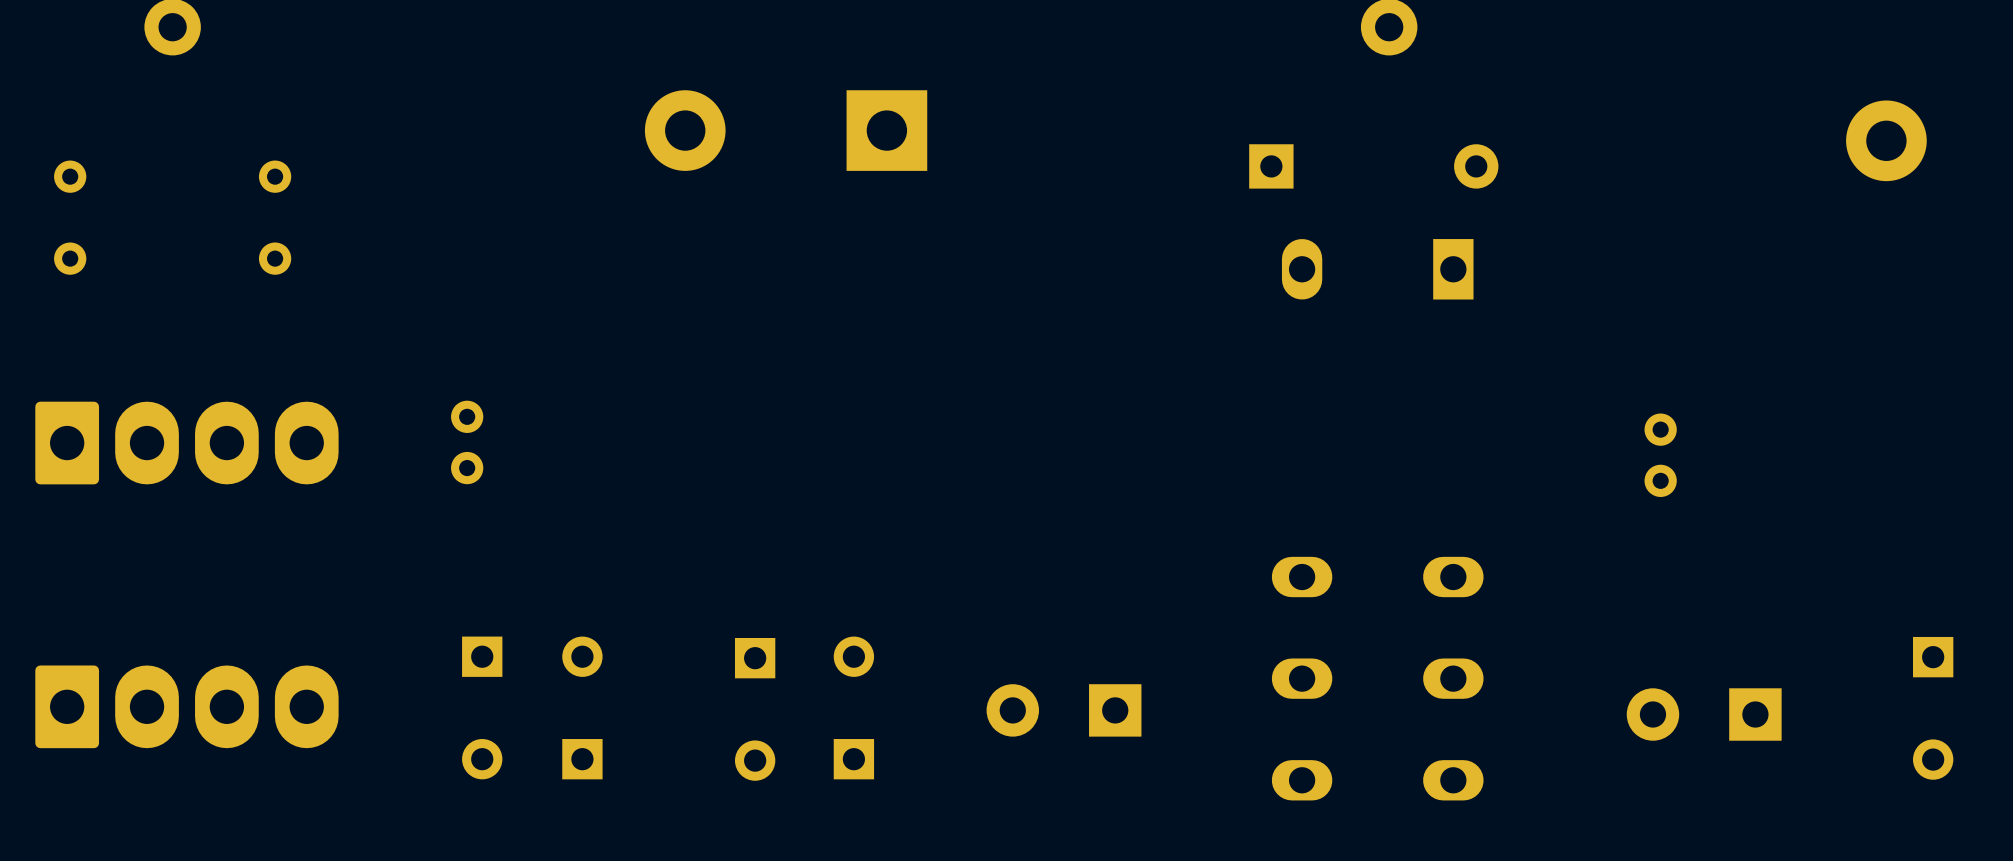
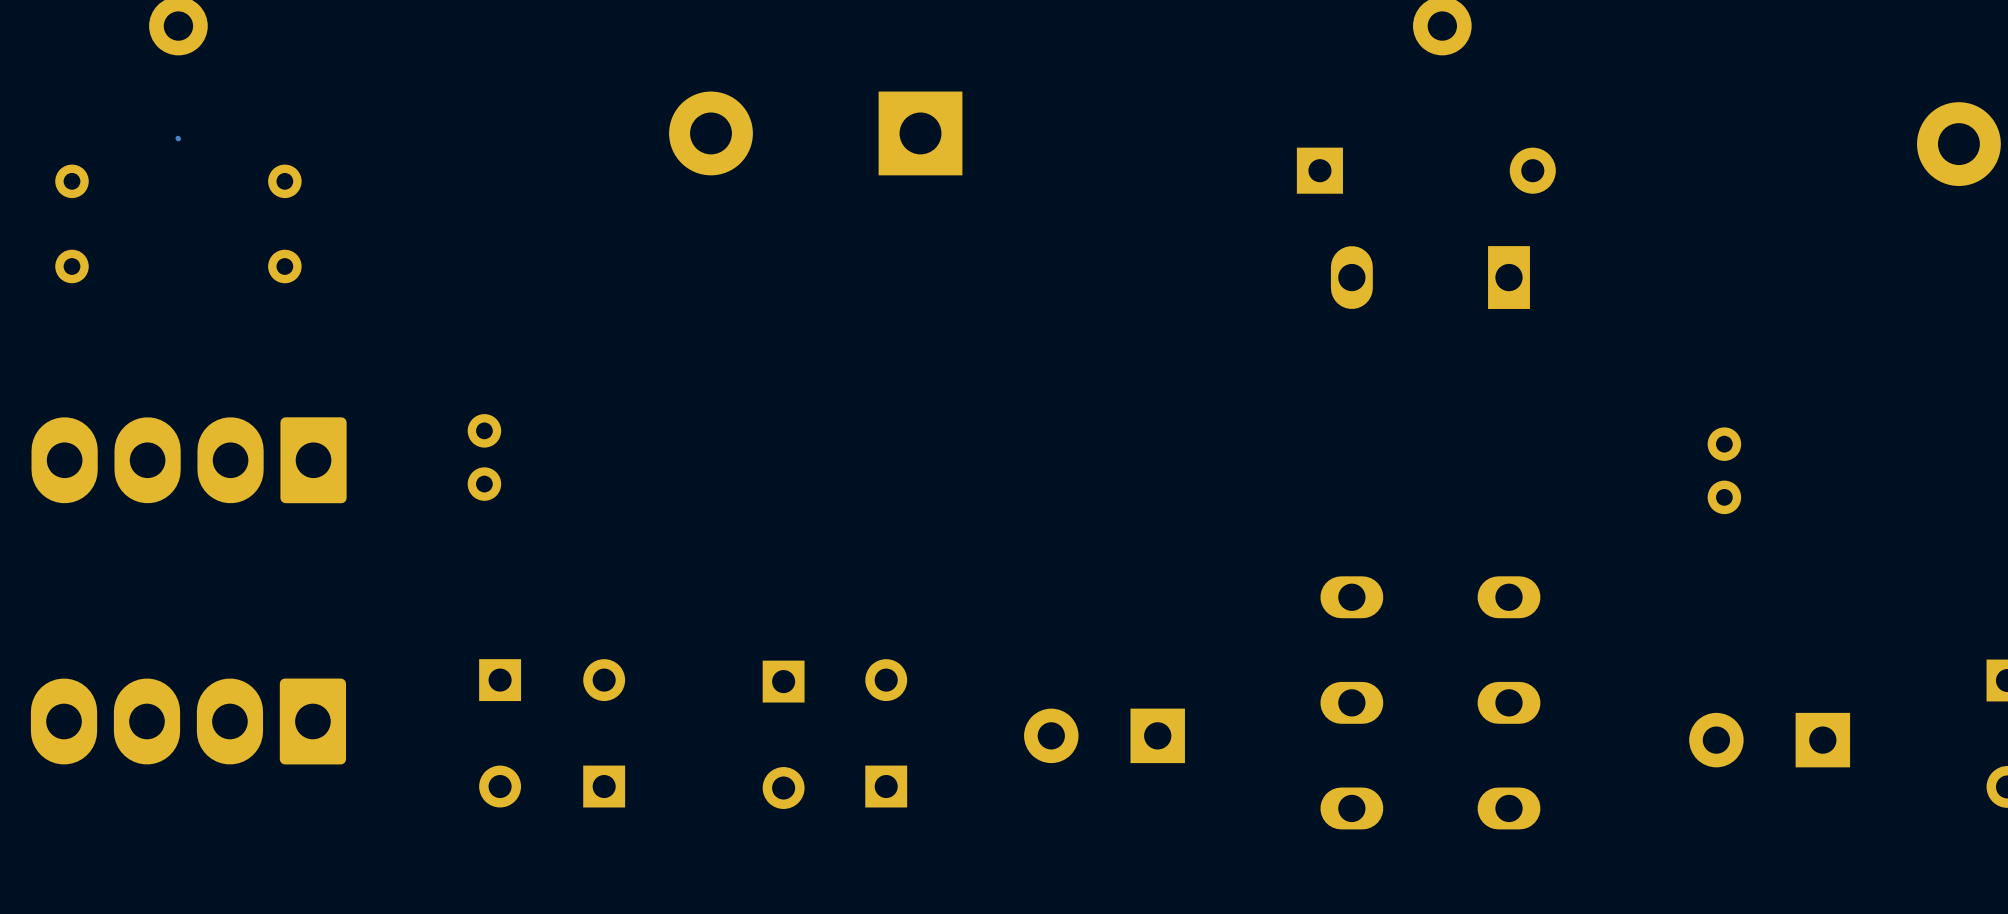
track: none -> (178, 138) (178, 138)
part rotation: 0° (186, 443) -> 180° (189, 460)
part rotation: 0° (186, 706) -> 180° (188, 721)

